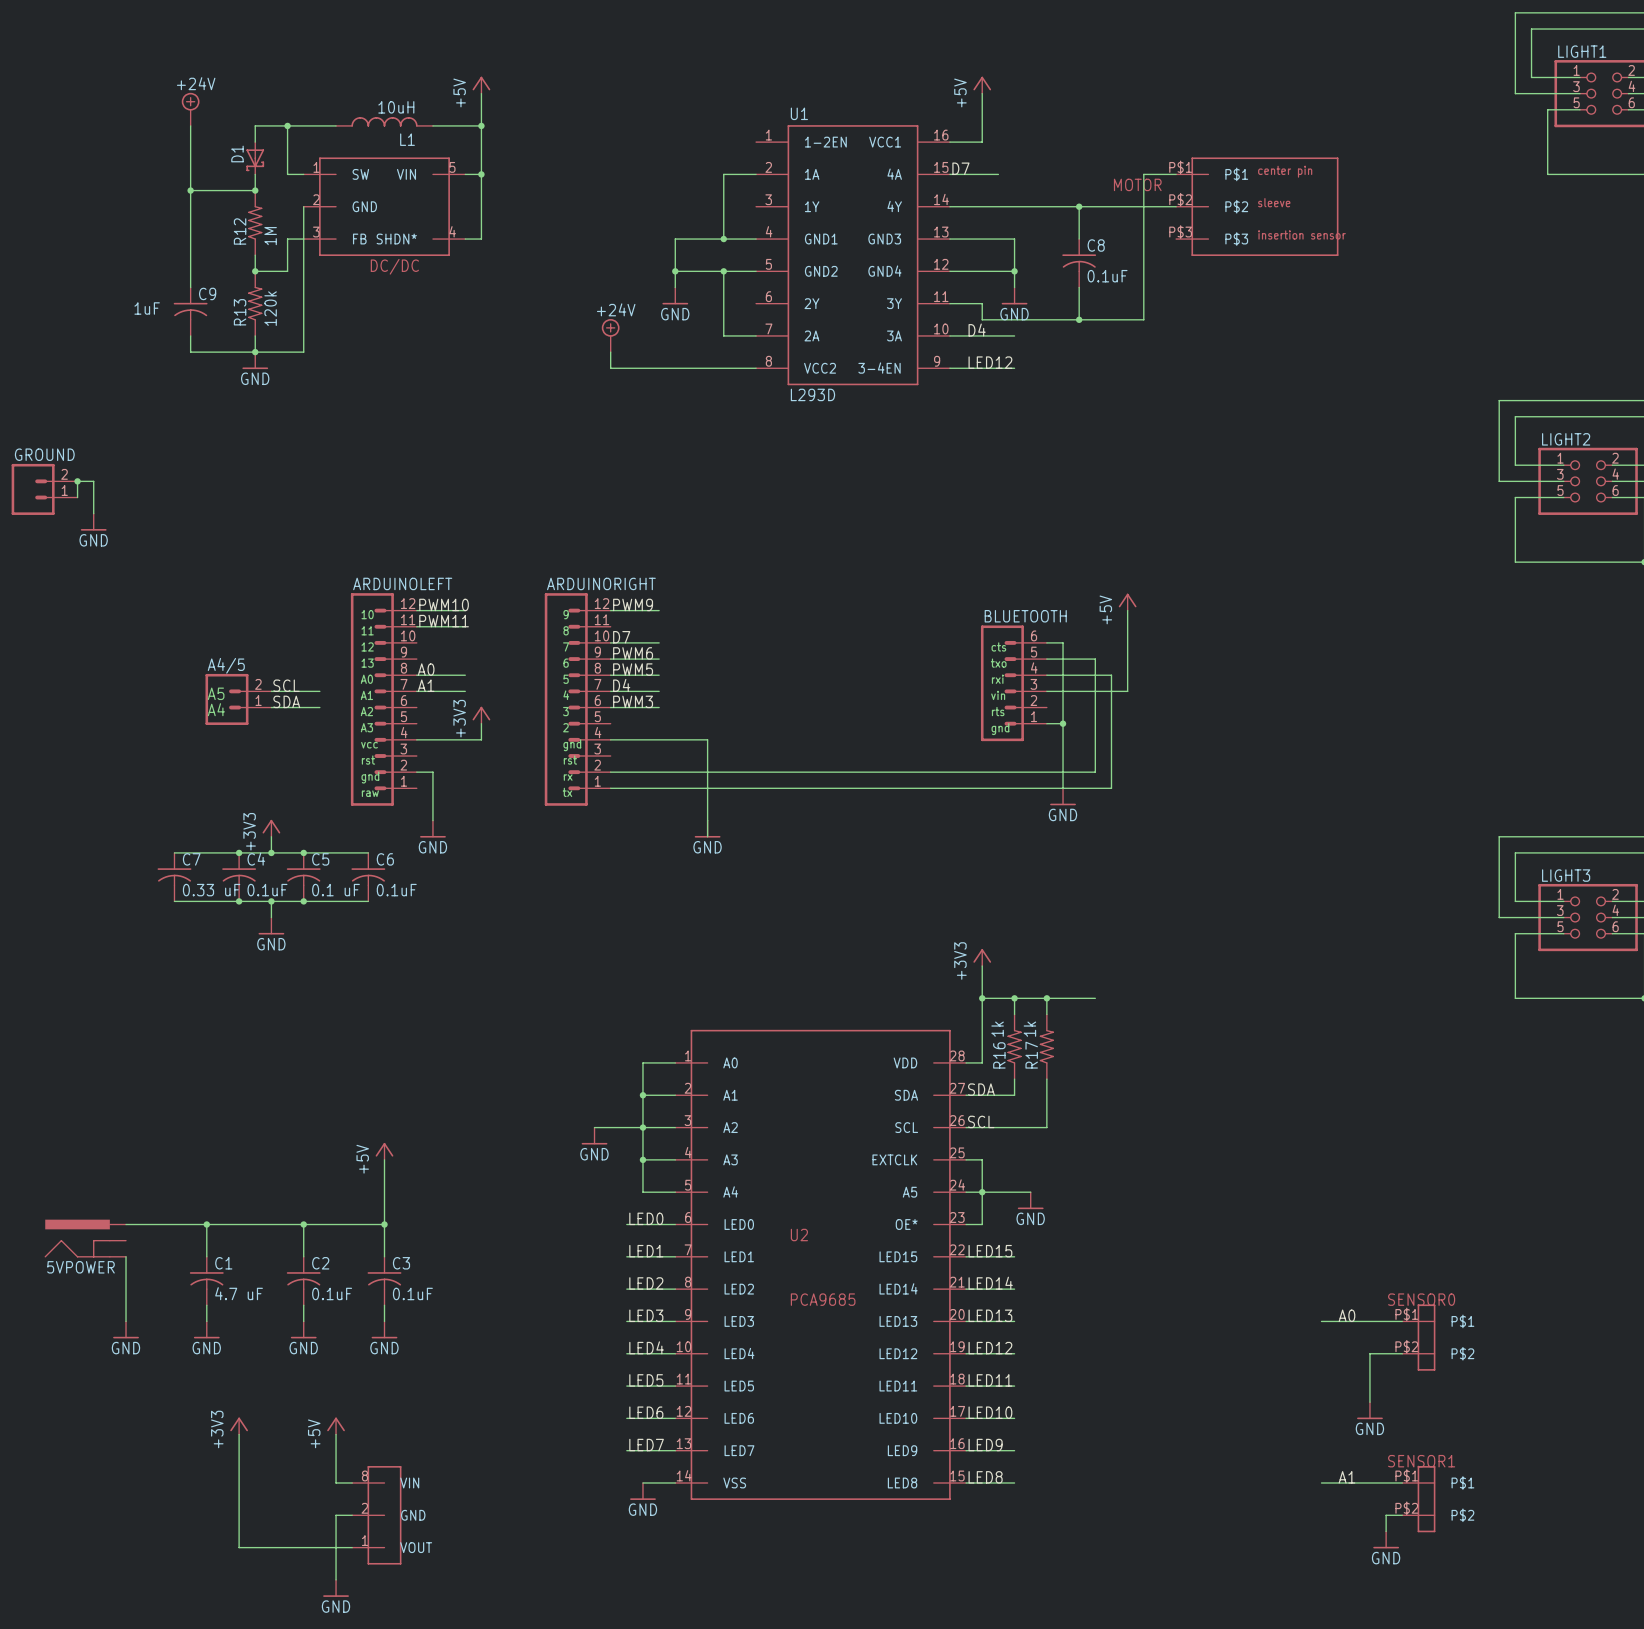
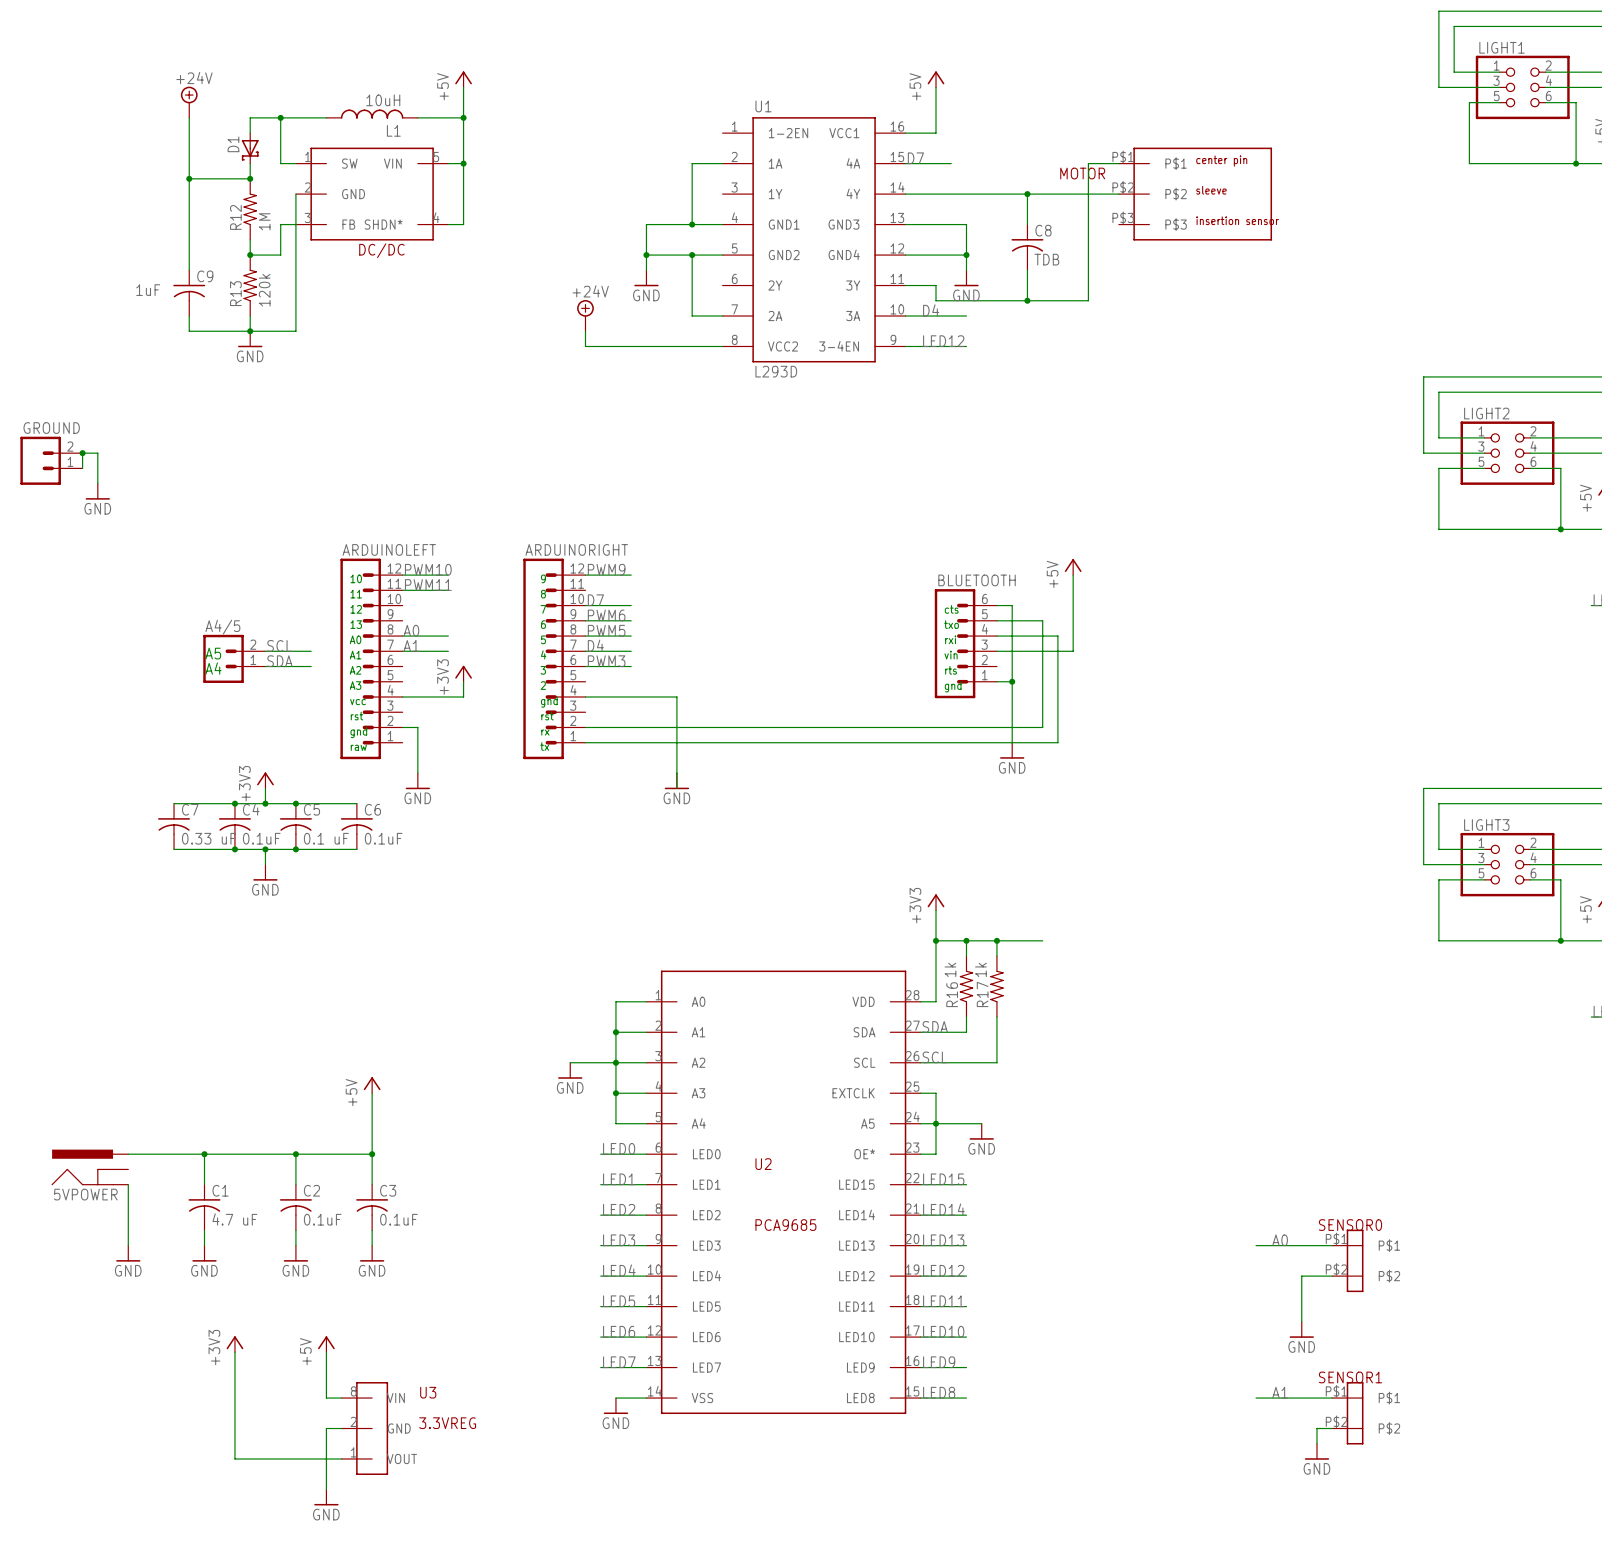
C8 value: 0.1uF (1107, 276) -> TDB (1046, 259)
U3 name: none -> U3 (428, 1392)
U3 value: none -> 3.3VREG (447, 1423)

